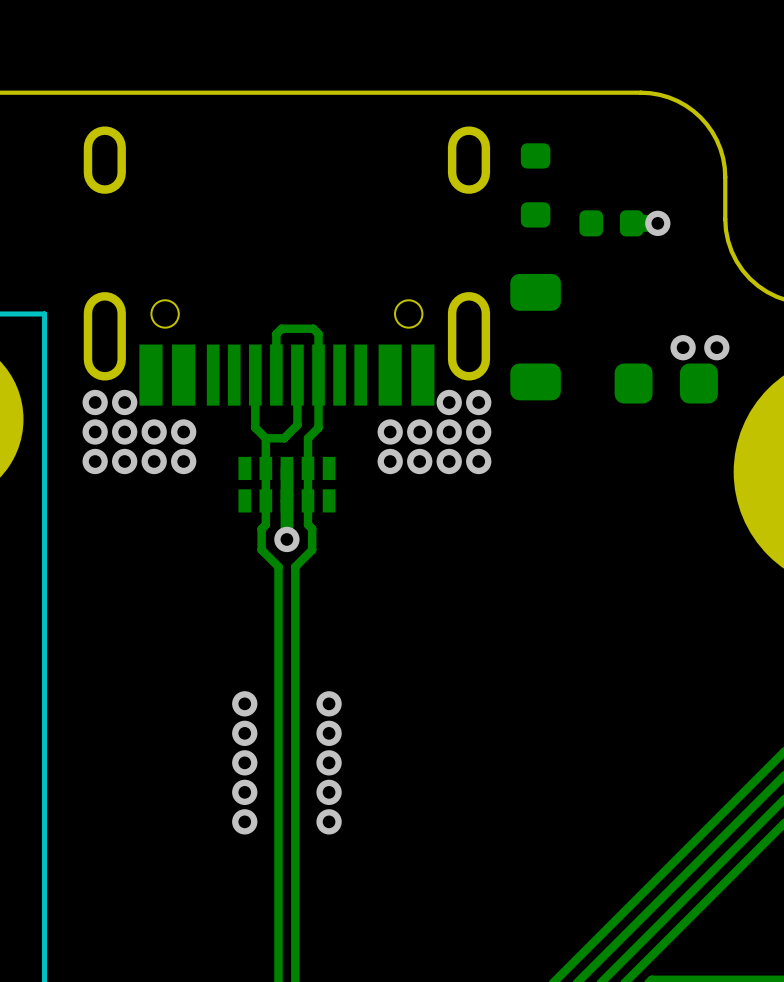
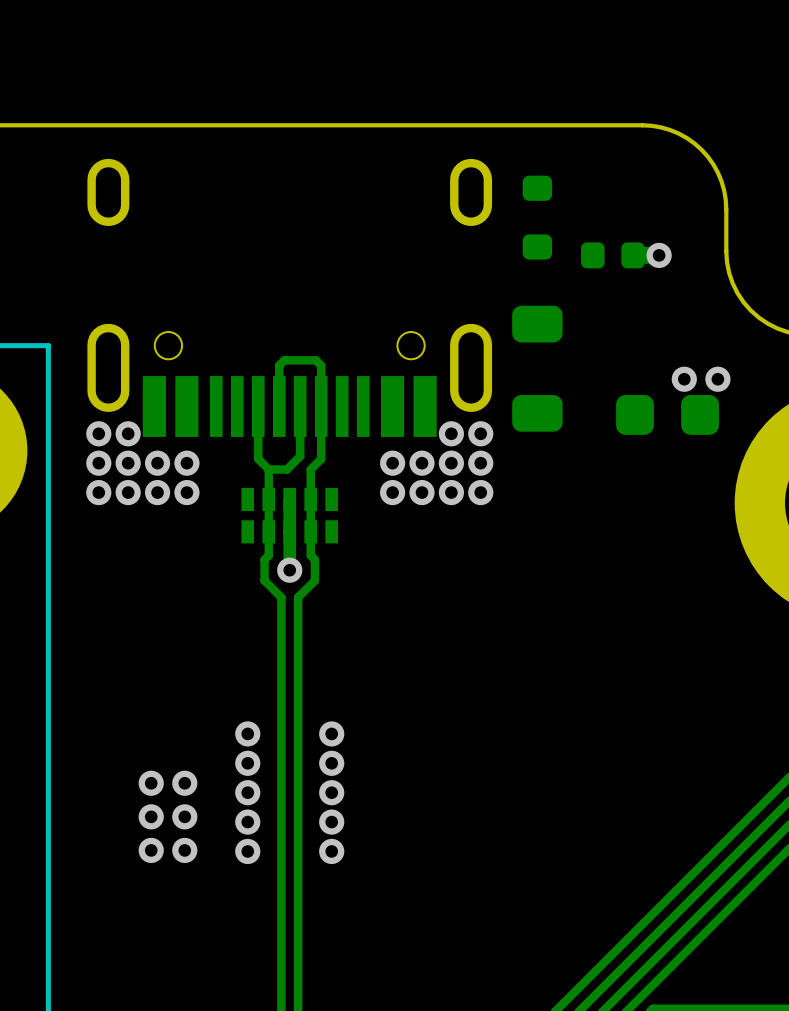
via: none -> (151, 783)
via: none -> (184, 783)
via: none -> (151, 816)
via: none -> (184, 816)
via: none -> (151, 850)
via: none -> (184, 850)

